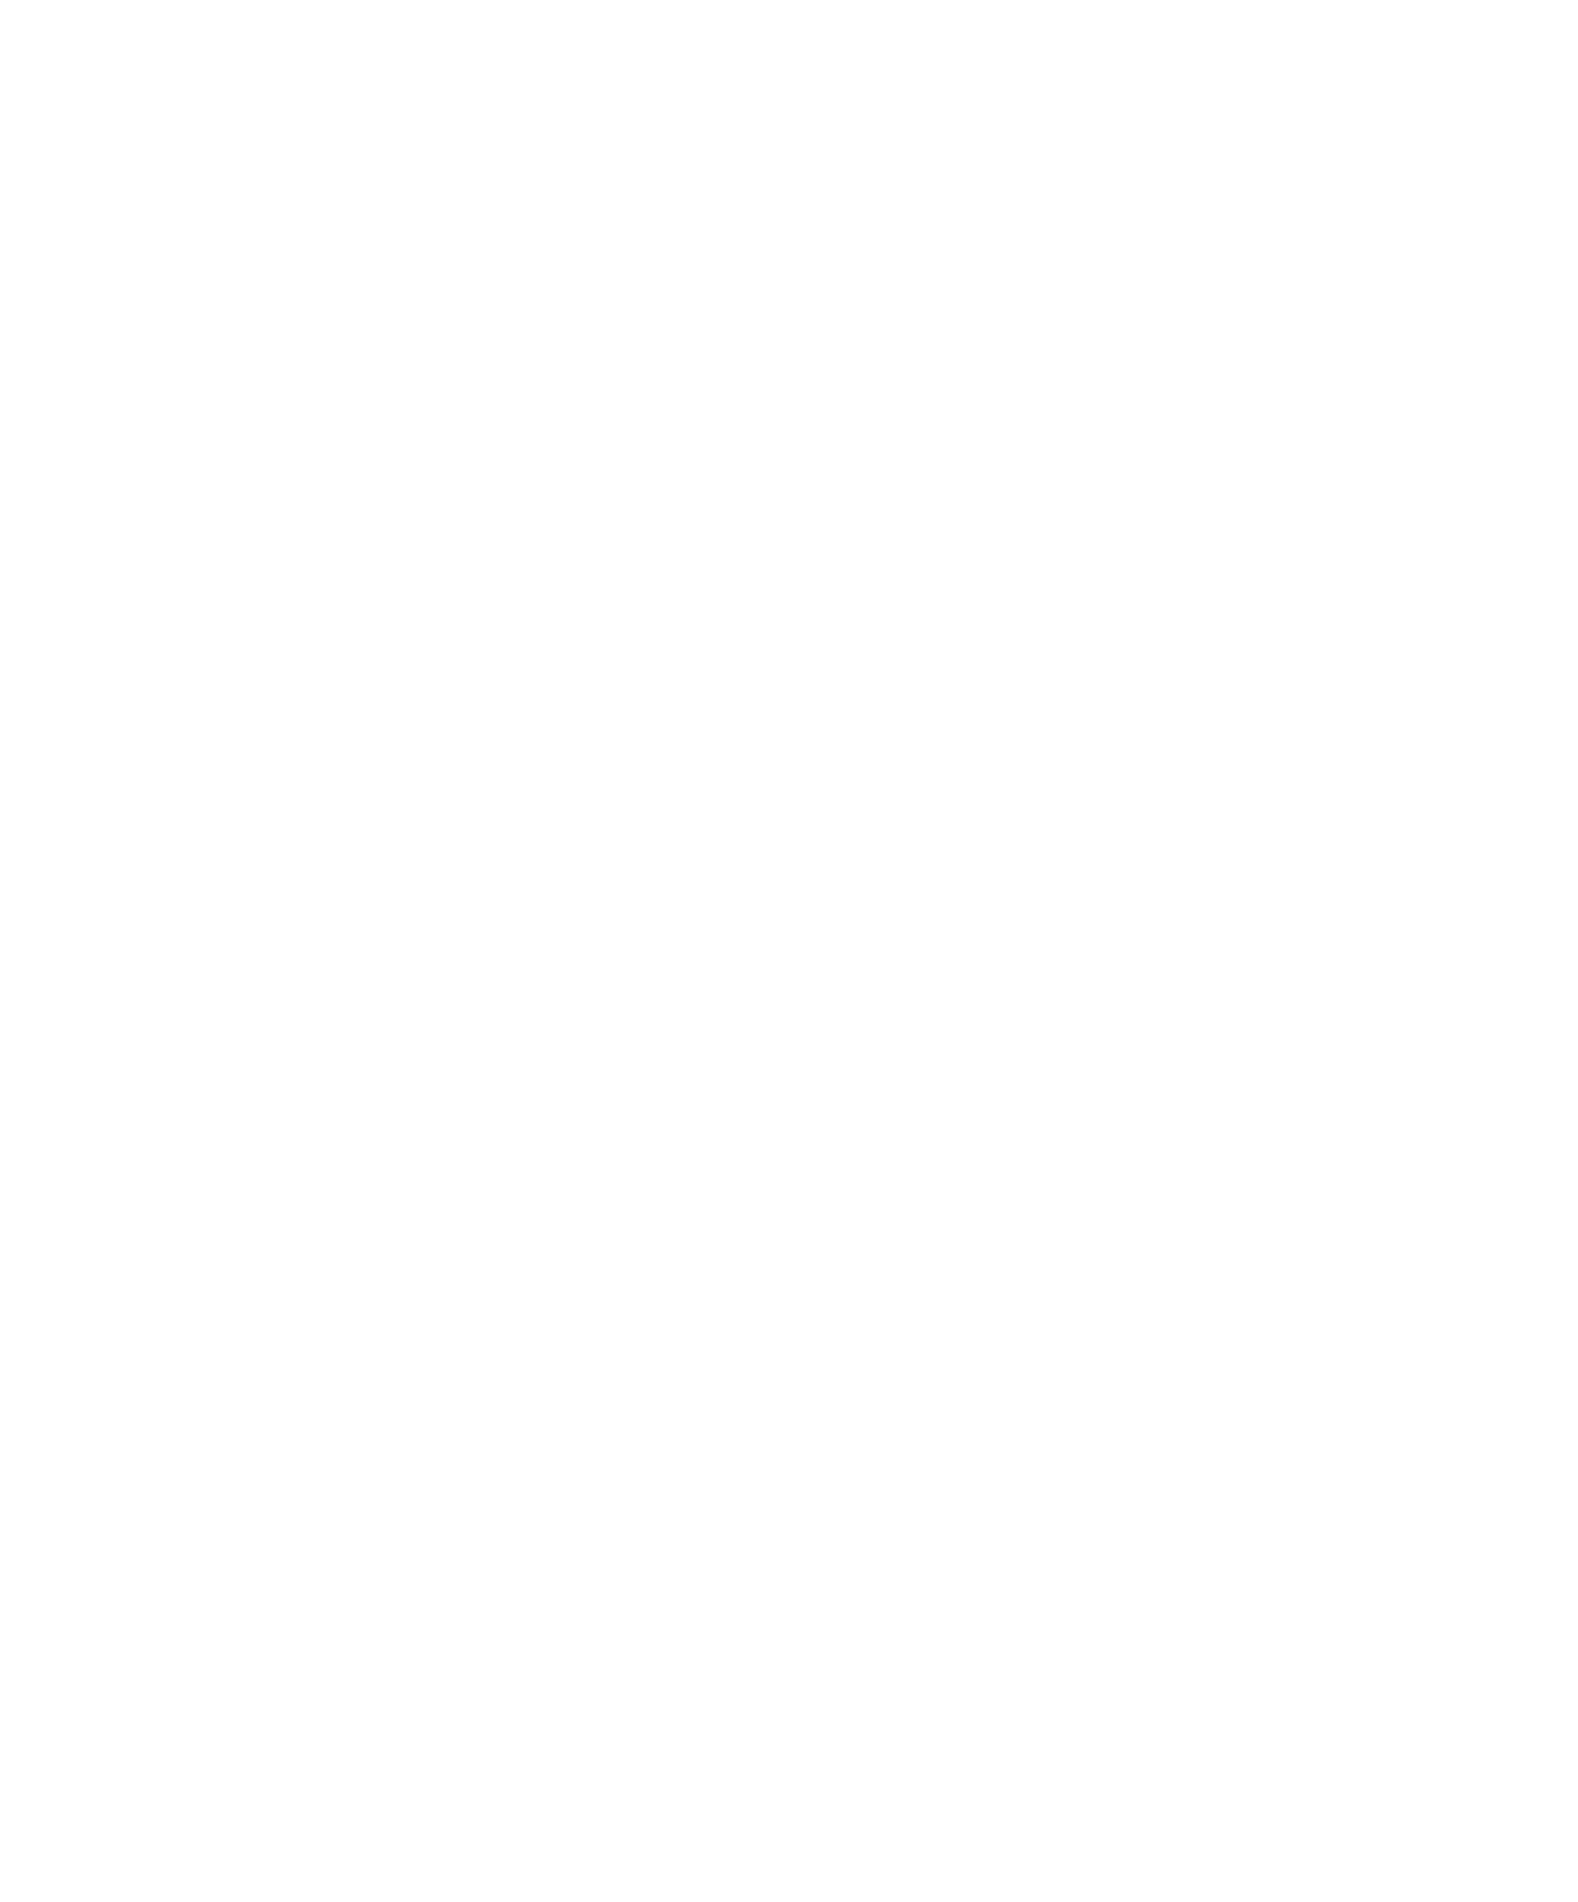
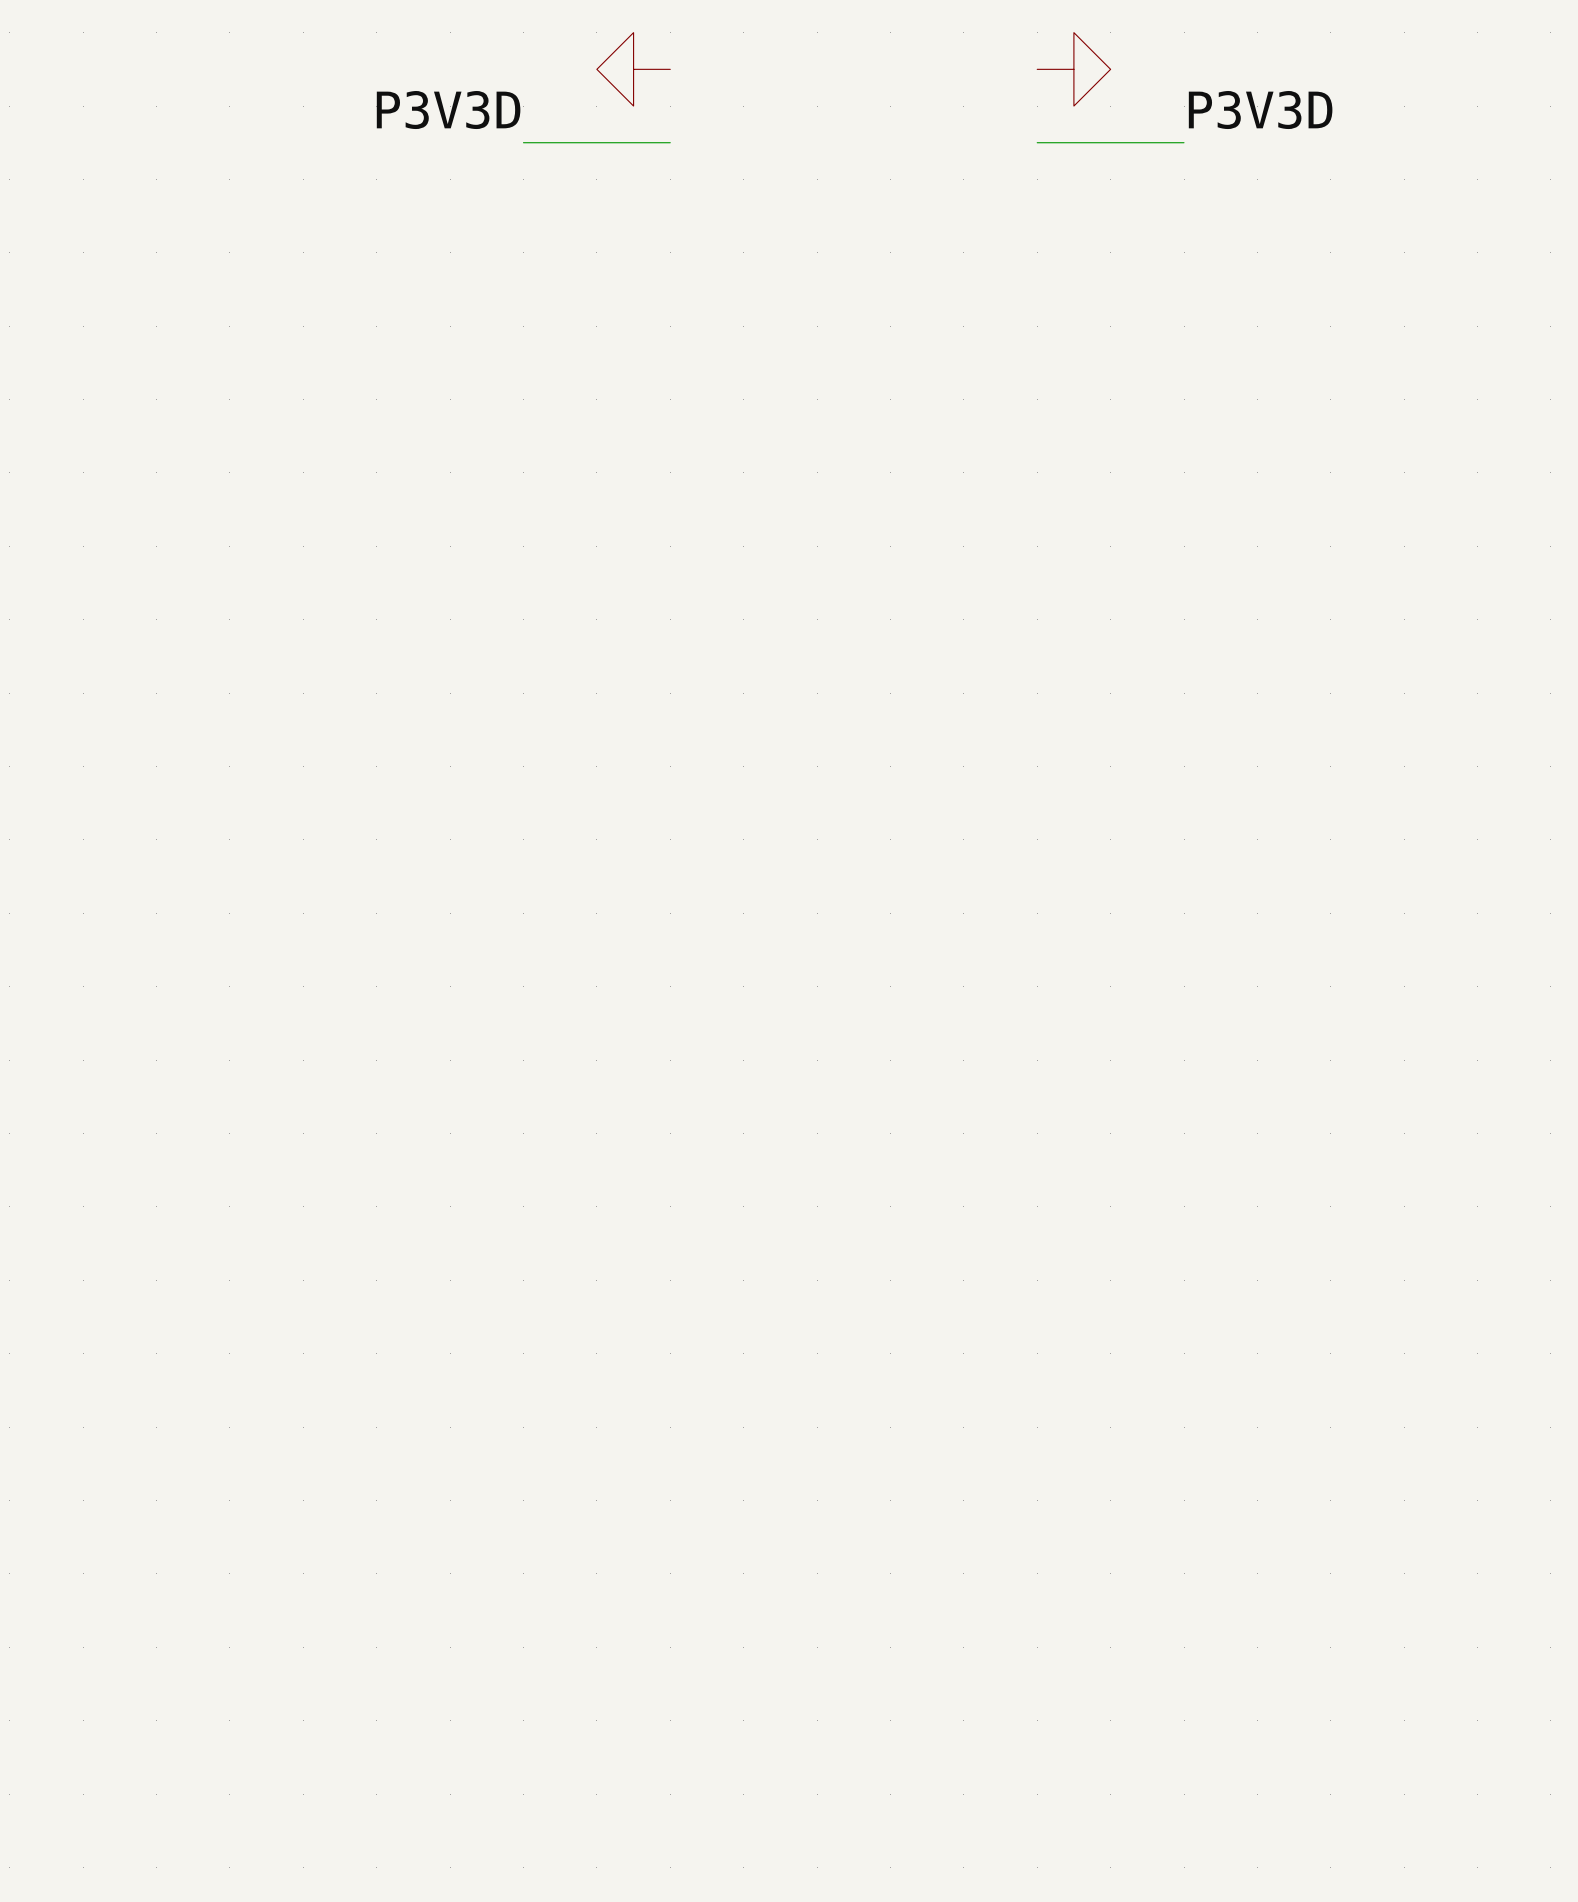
power symbol: none -> (633, 69)
power symbol: none -> (1073, 69)
label: none -> P3V3D (448, 110)
label: none -> P3V3D (1260, 110)
wire: none -> (523, 142) (670, 142)
wire: none -> (1037, 142) (1184, 142)

